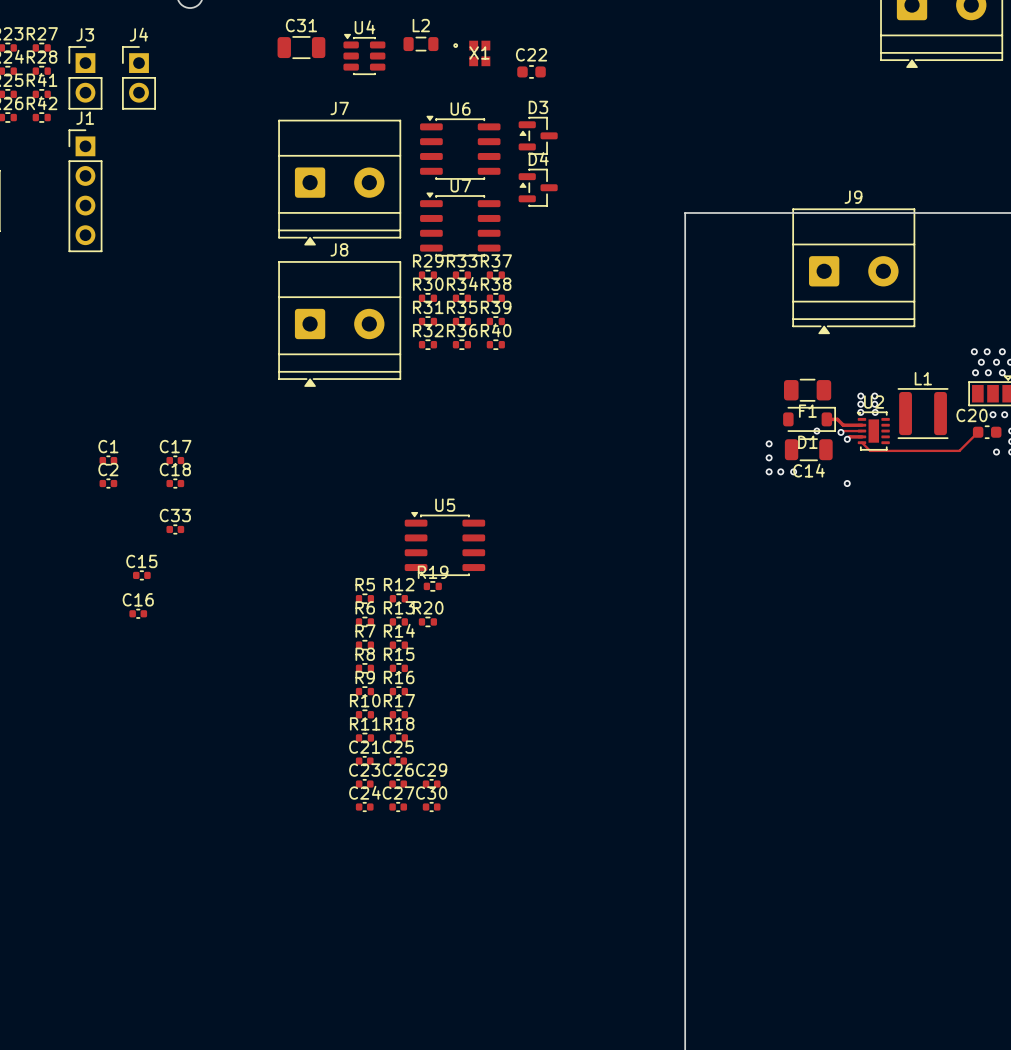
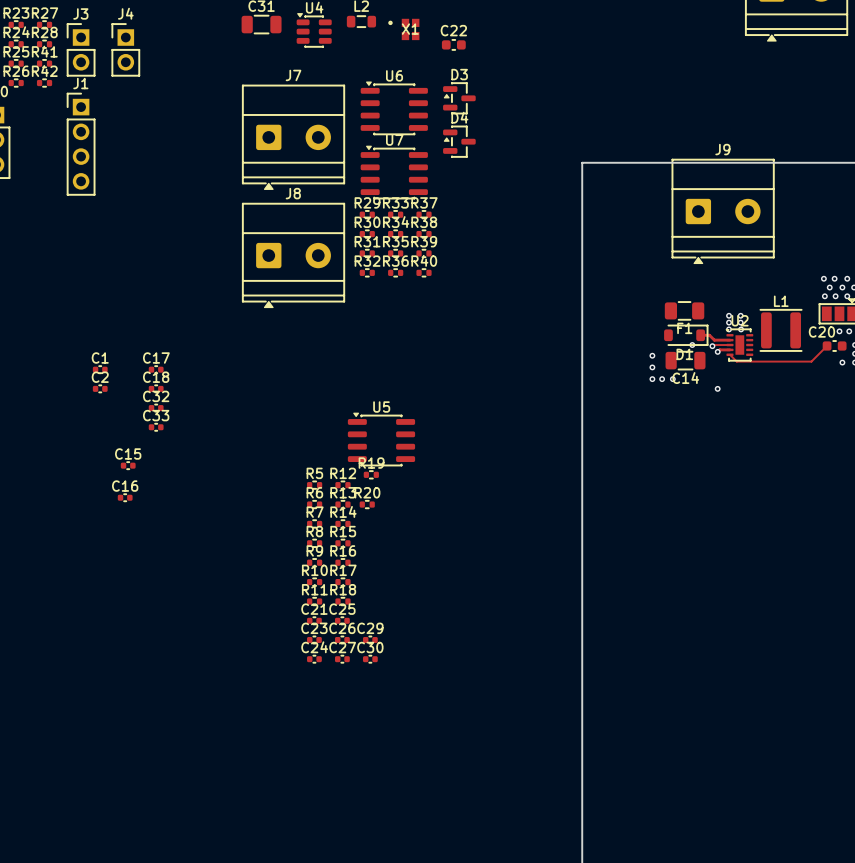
C32: none -> (156, 408)

